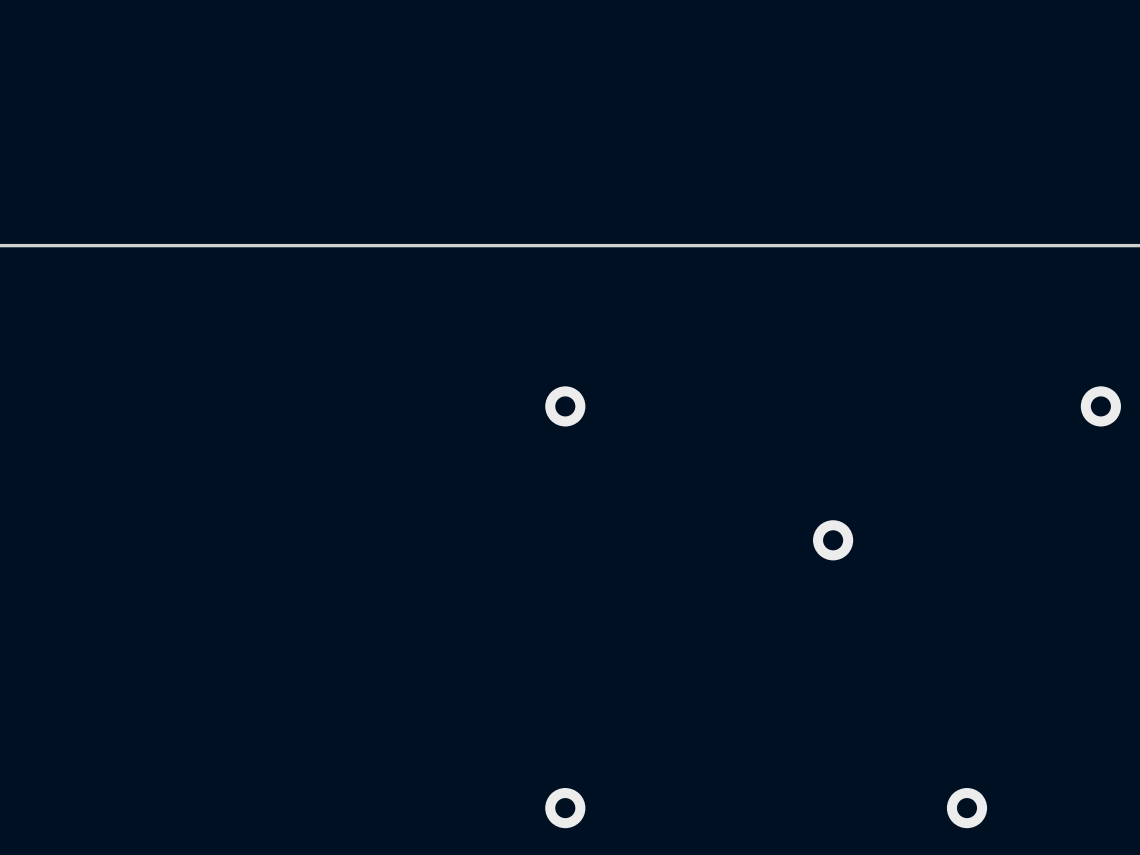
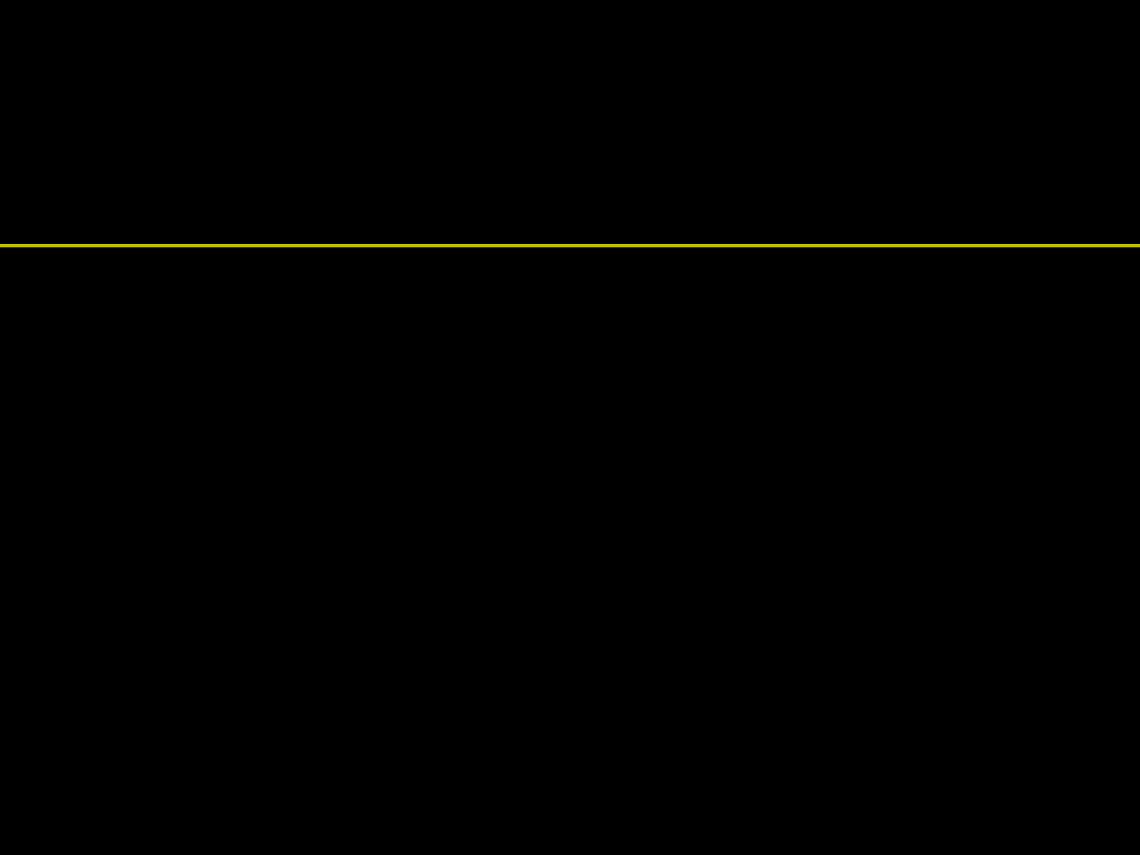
via: (565, 406) -> none
via: (1100, 406) -> none
via: (833, 540) -> none
via: (565, 808) -> none
via: (966, 808) -> none

